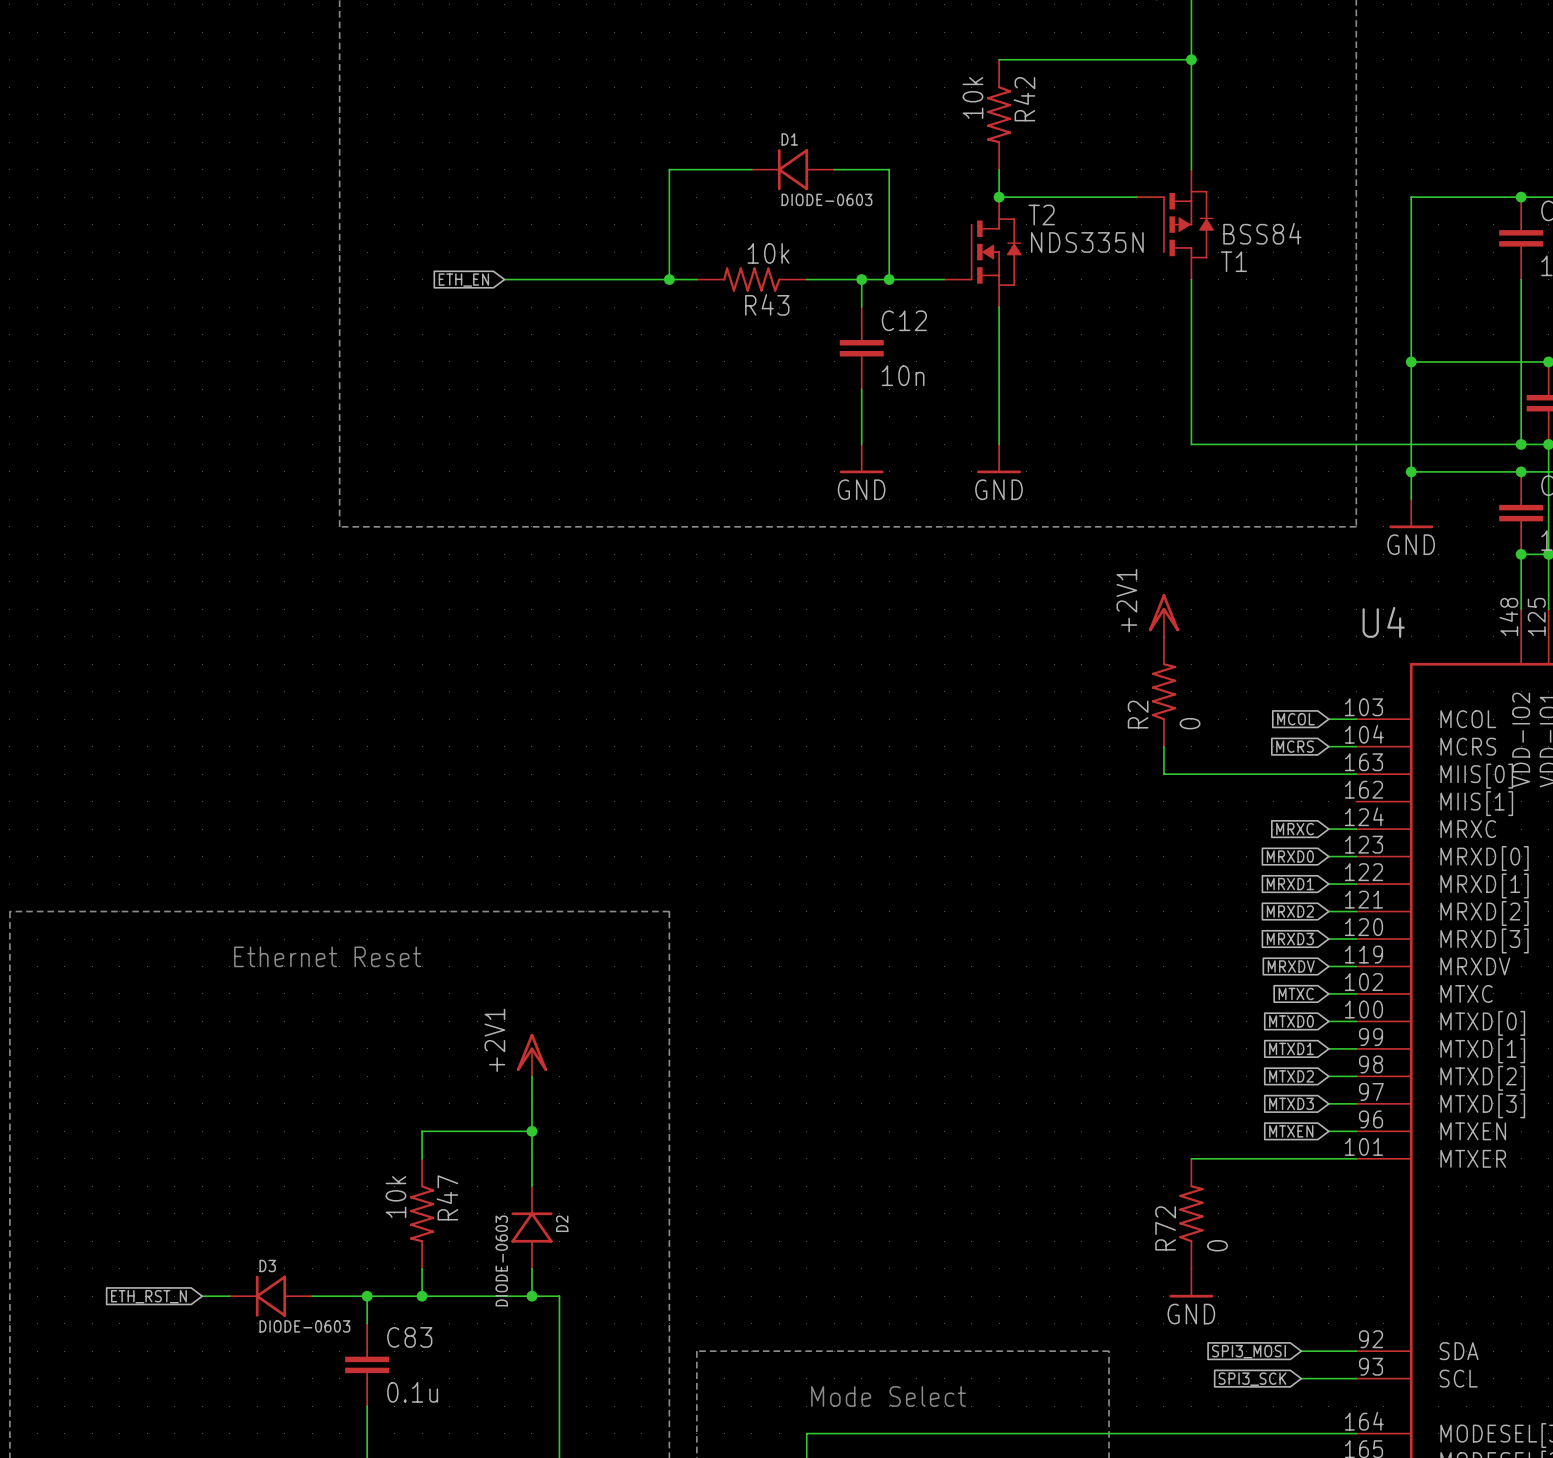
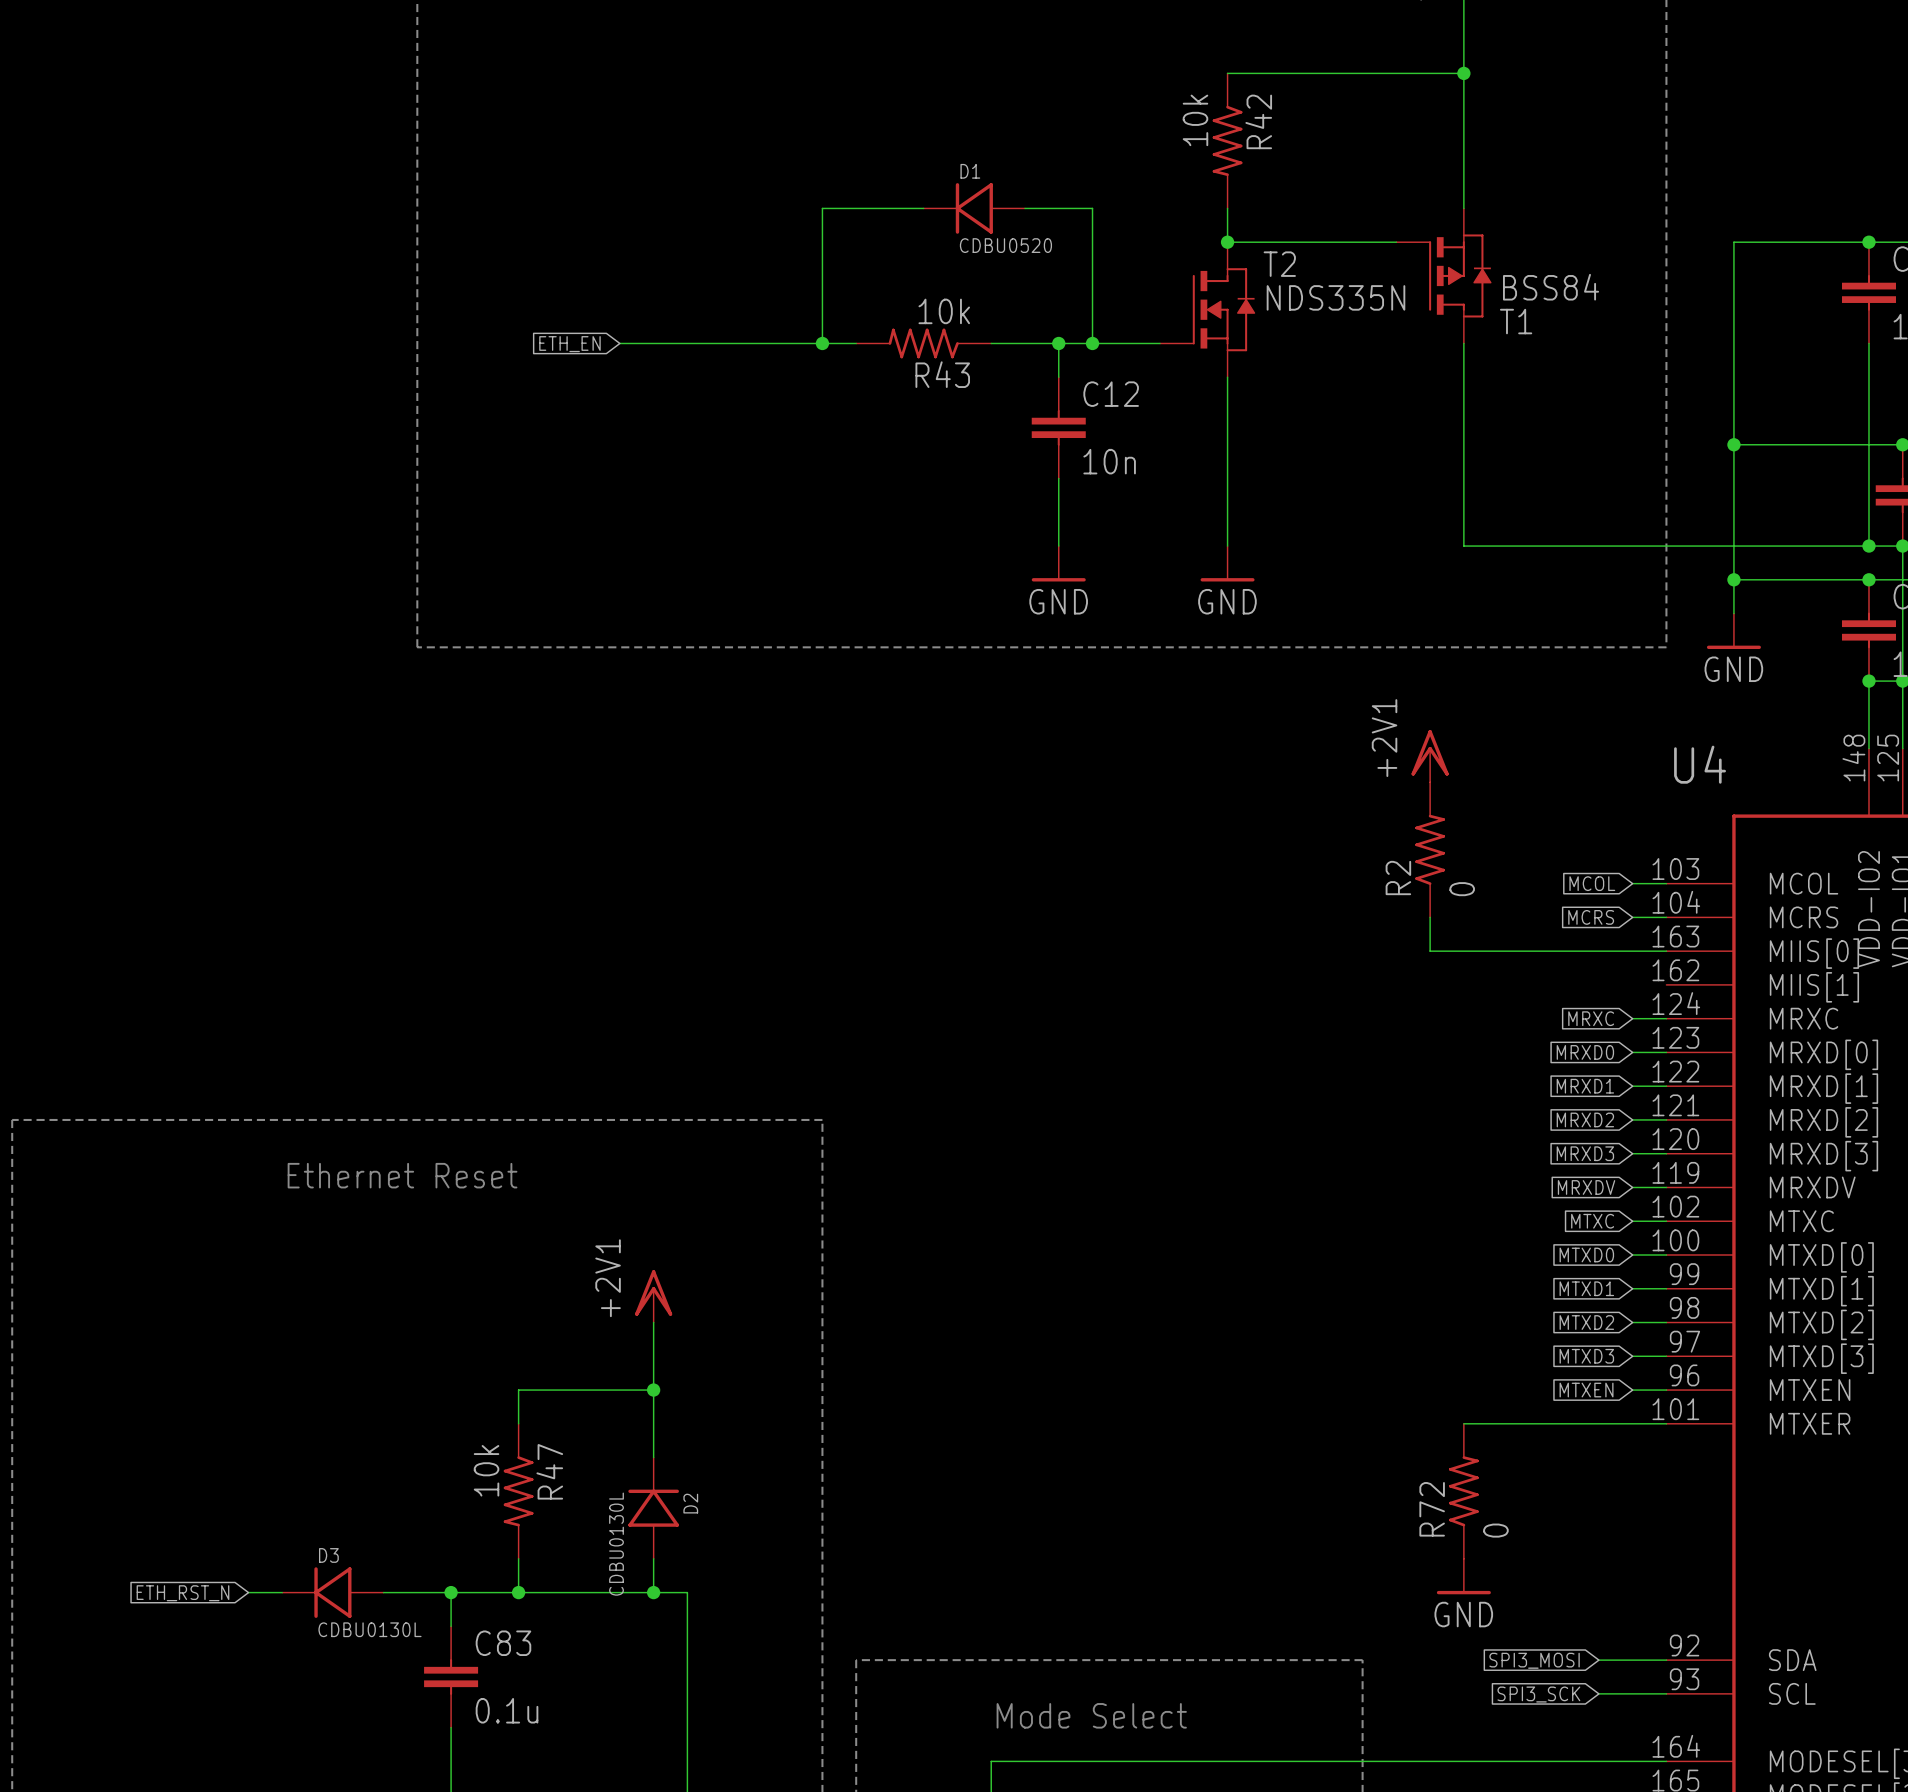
D1 value: DIODE-0603 (826, 199) -> CDBU0520 (1005, 245)
D2 value: DIODE-0603 (501, 1260) -> CDBU0130L (616, 1544)
D3 value: DIODE-0603 (304, 1326) -> CDBU0130L (369, 1629)

